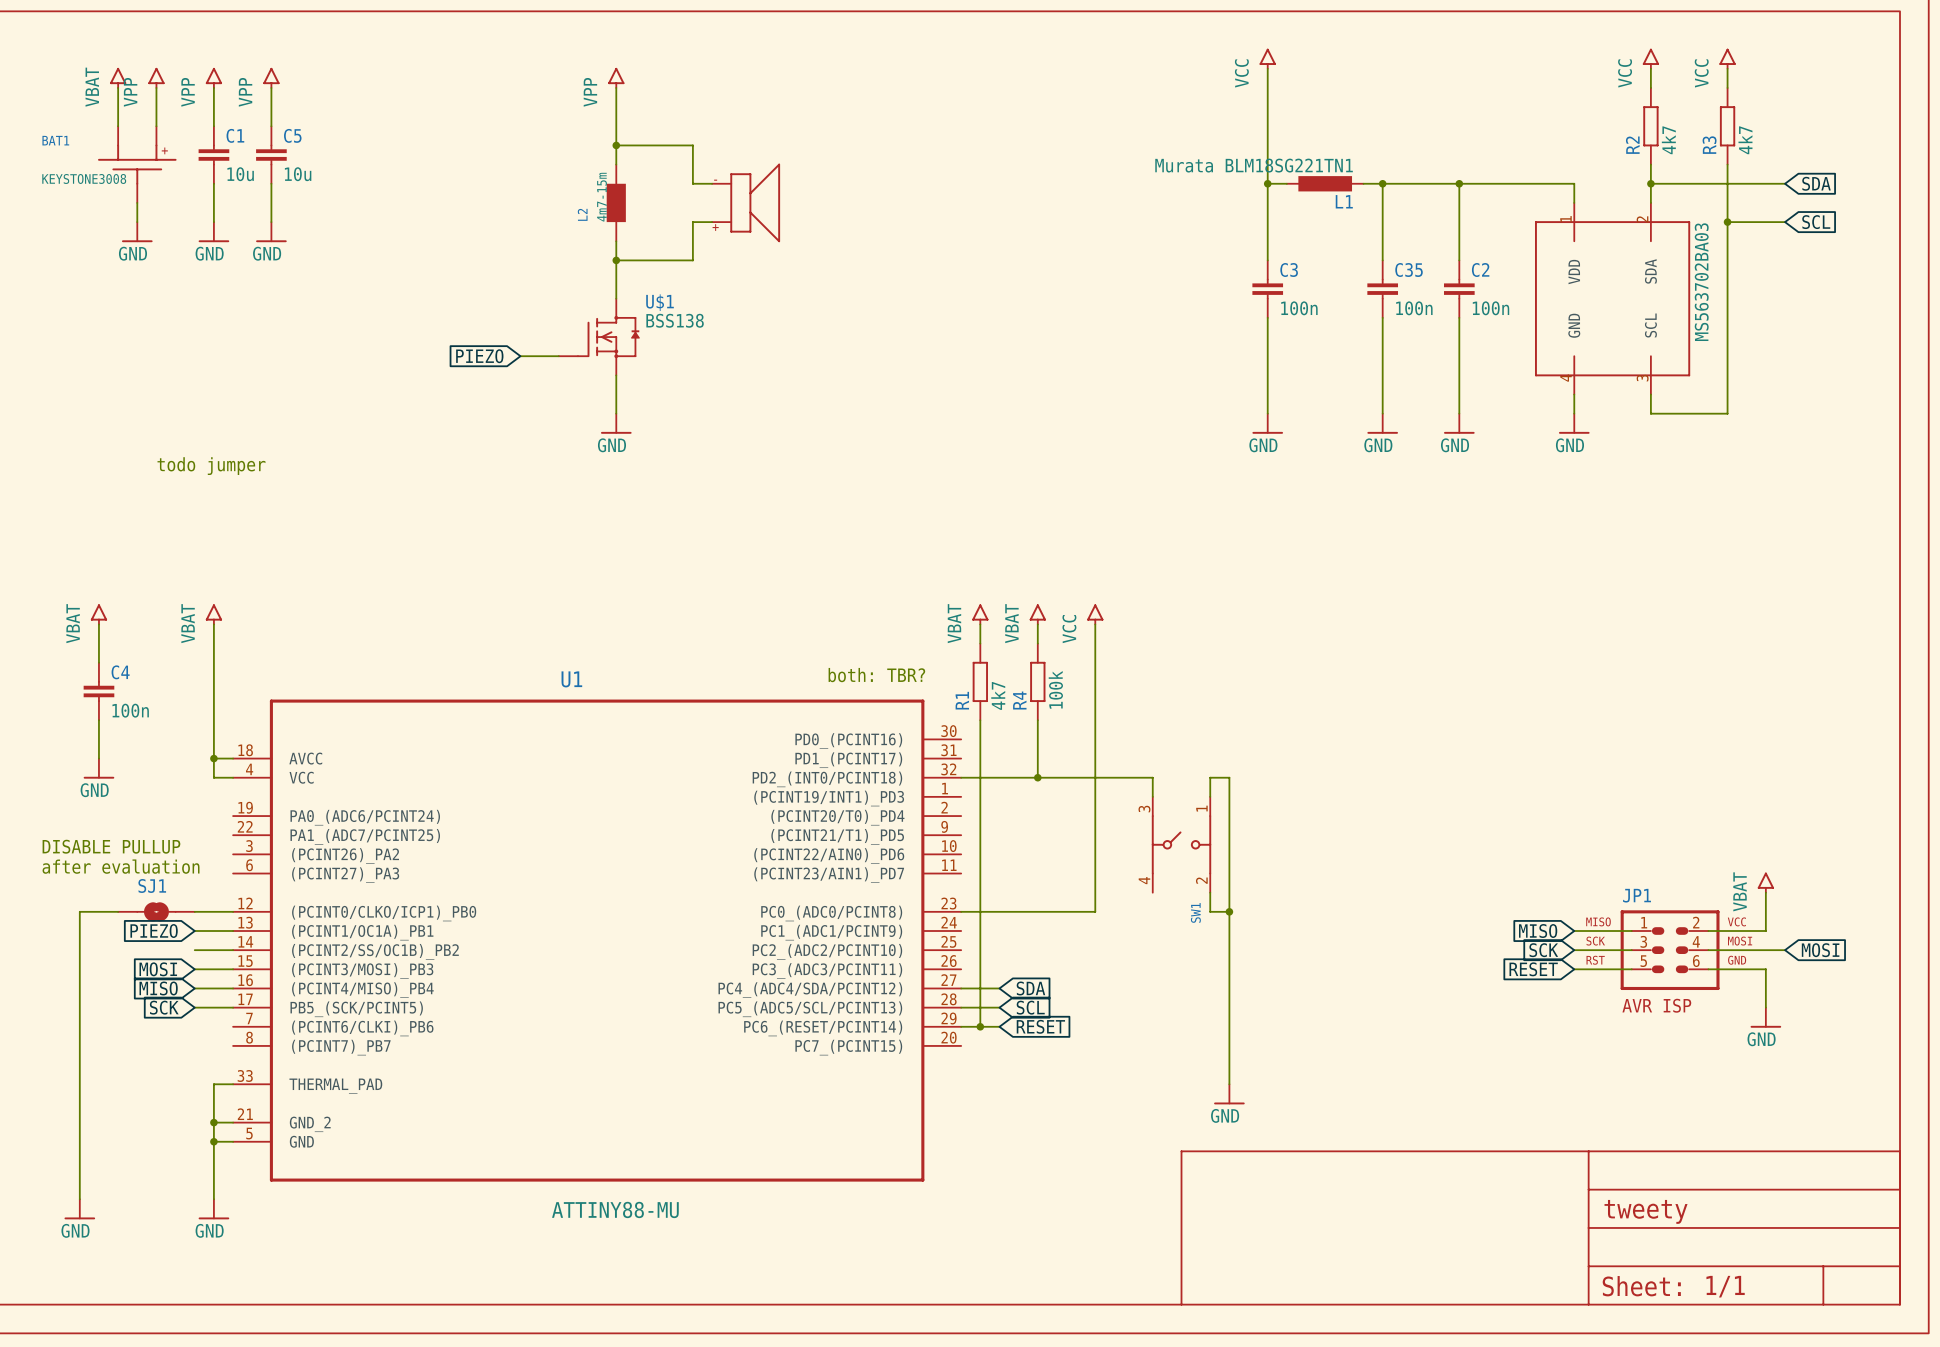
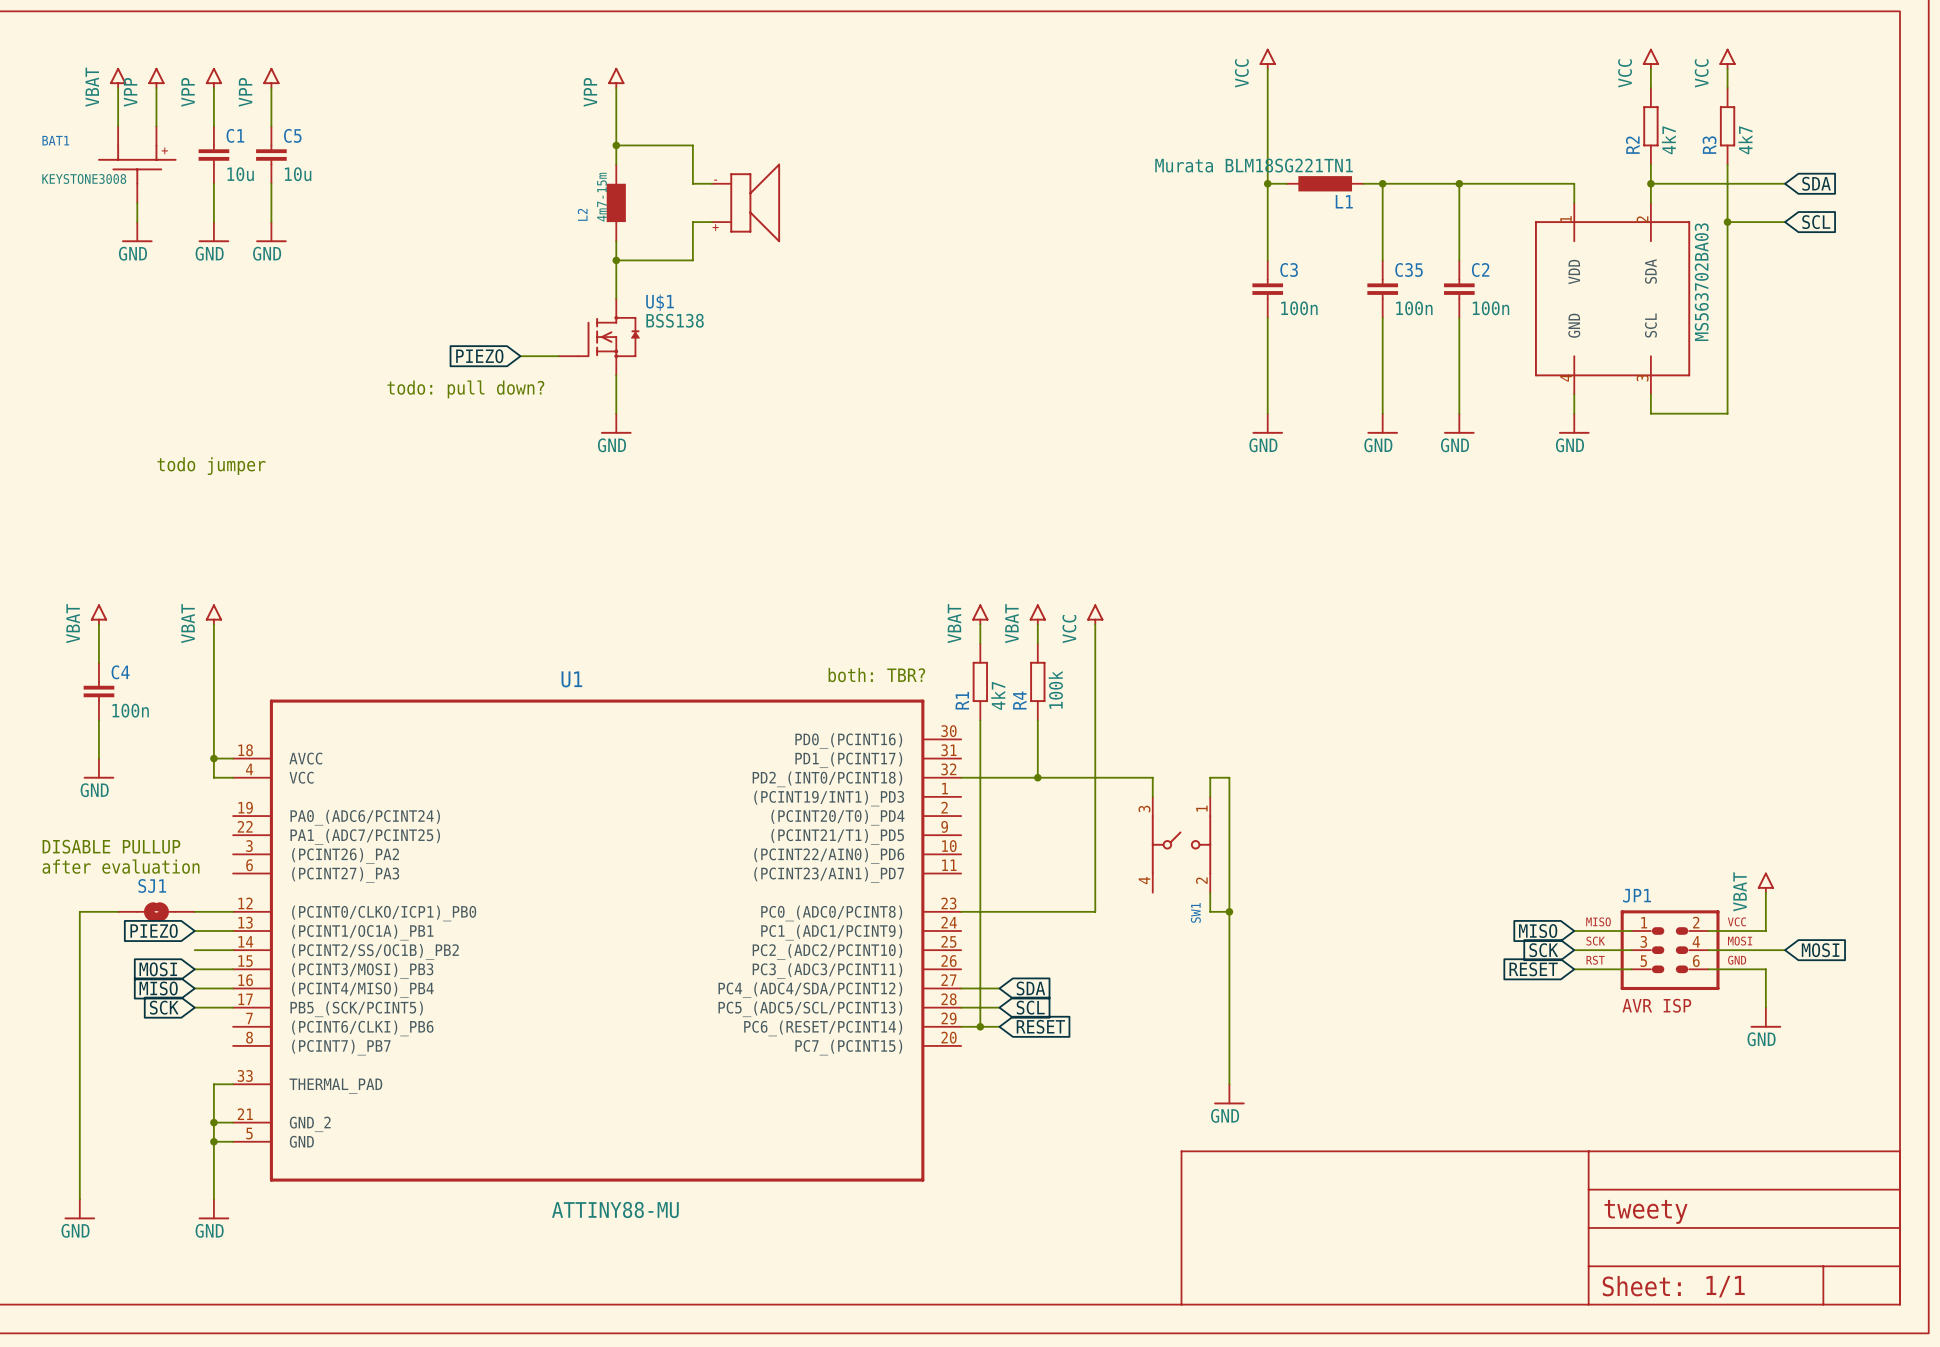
text: none -> todo: pull down? (465, 389)

